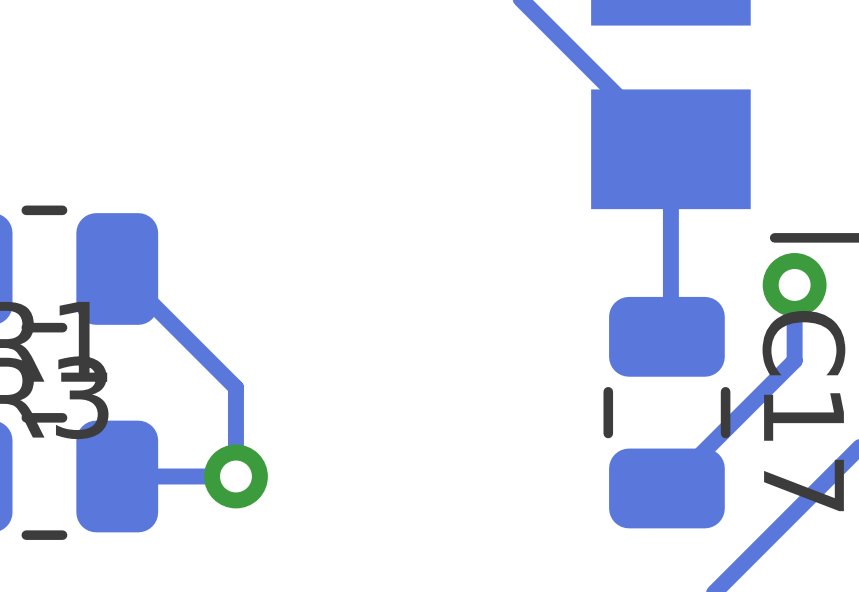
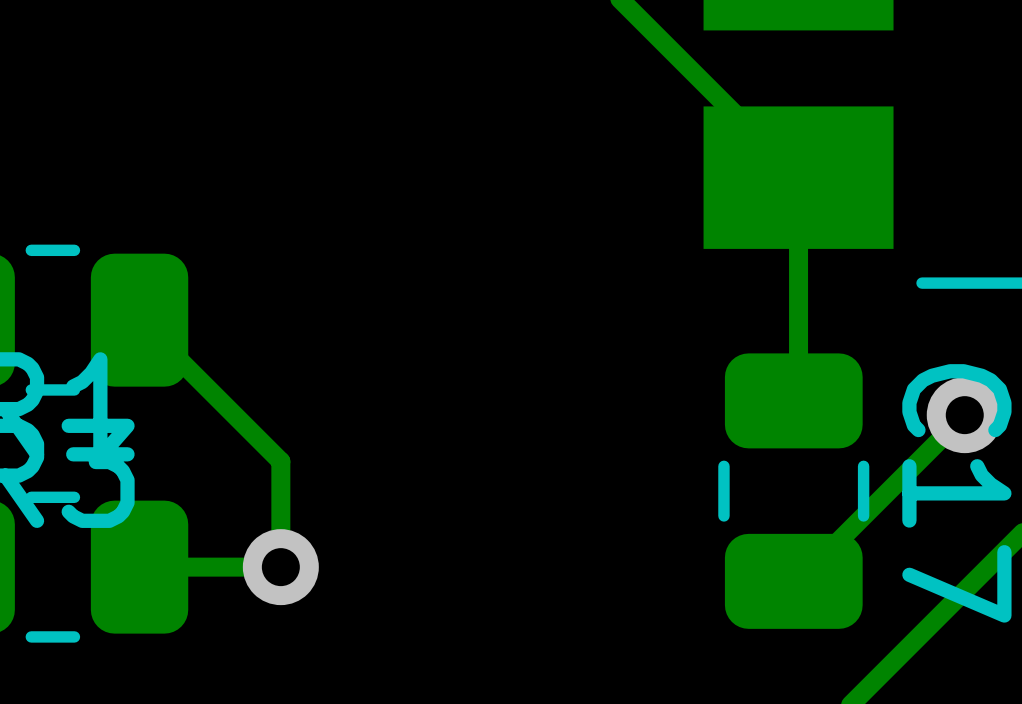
track: (794, 284) (794, 360) (666, 488) -> (964, 415) (798, 581) (793, 581)
via position: (794, 284) -> (964, 415)

